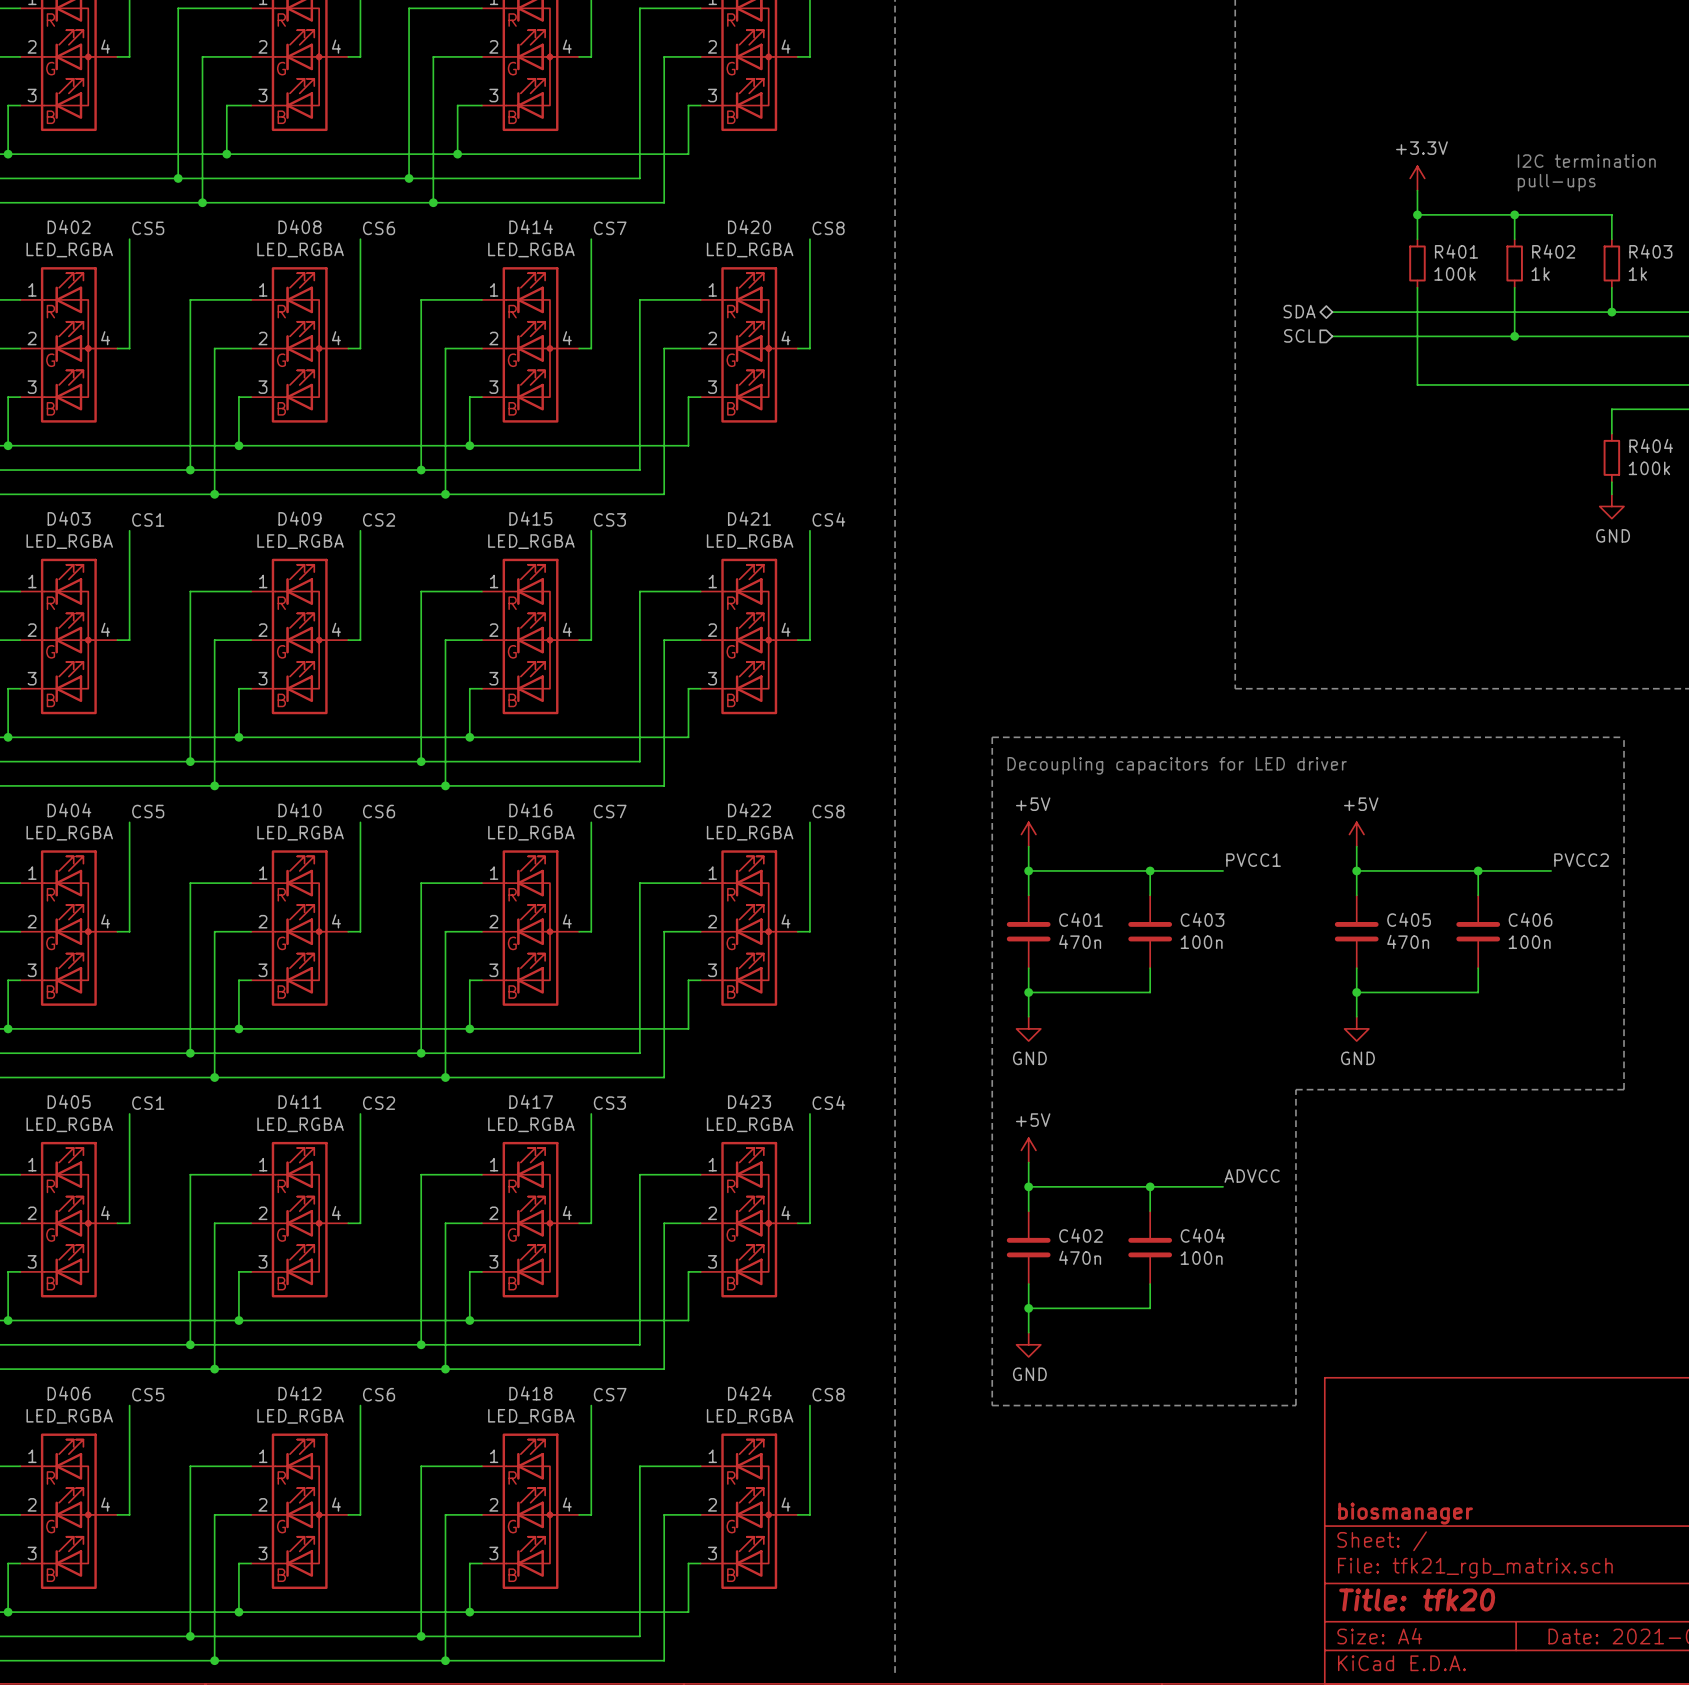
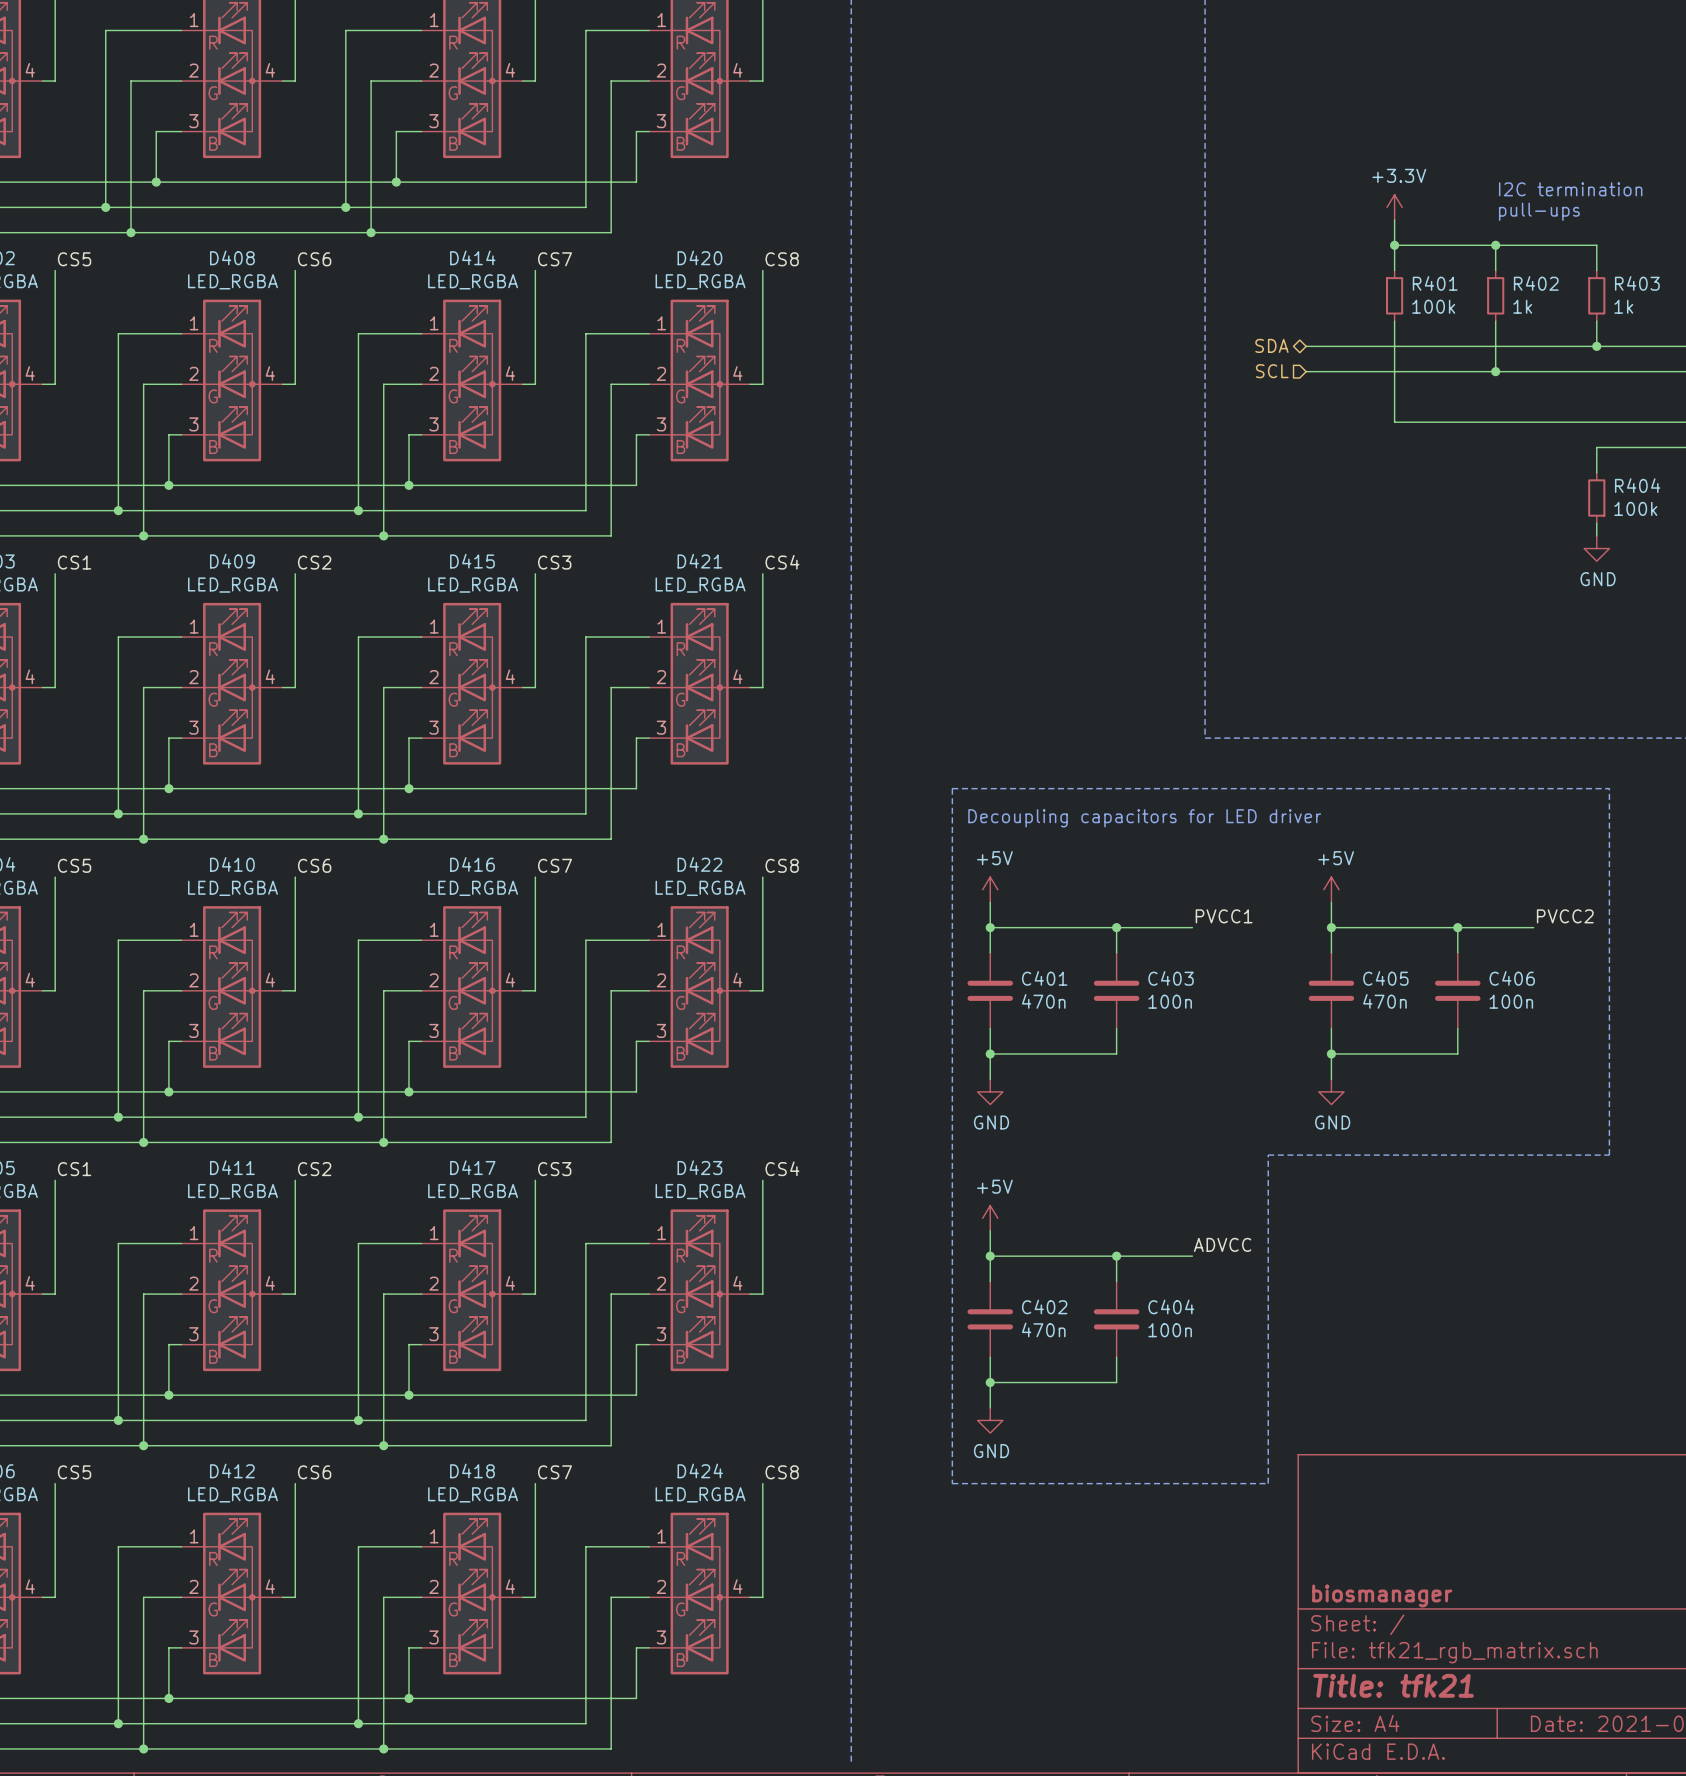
title block: Title: tfk20 (1417, 1599) -> Title: tfk21 (1393, 1685)

